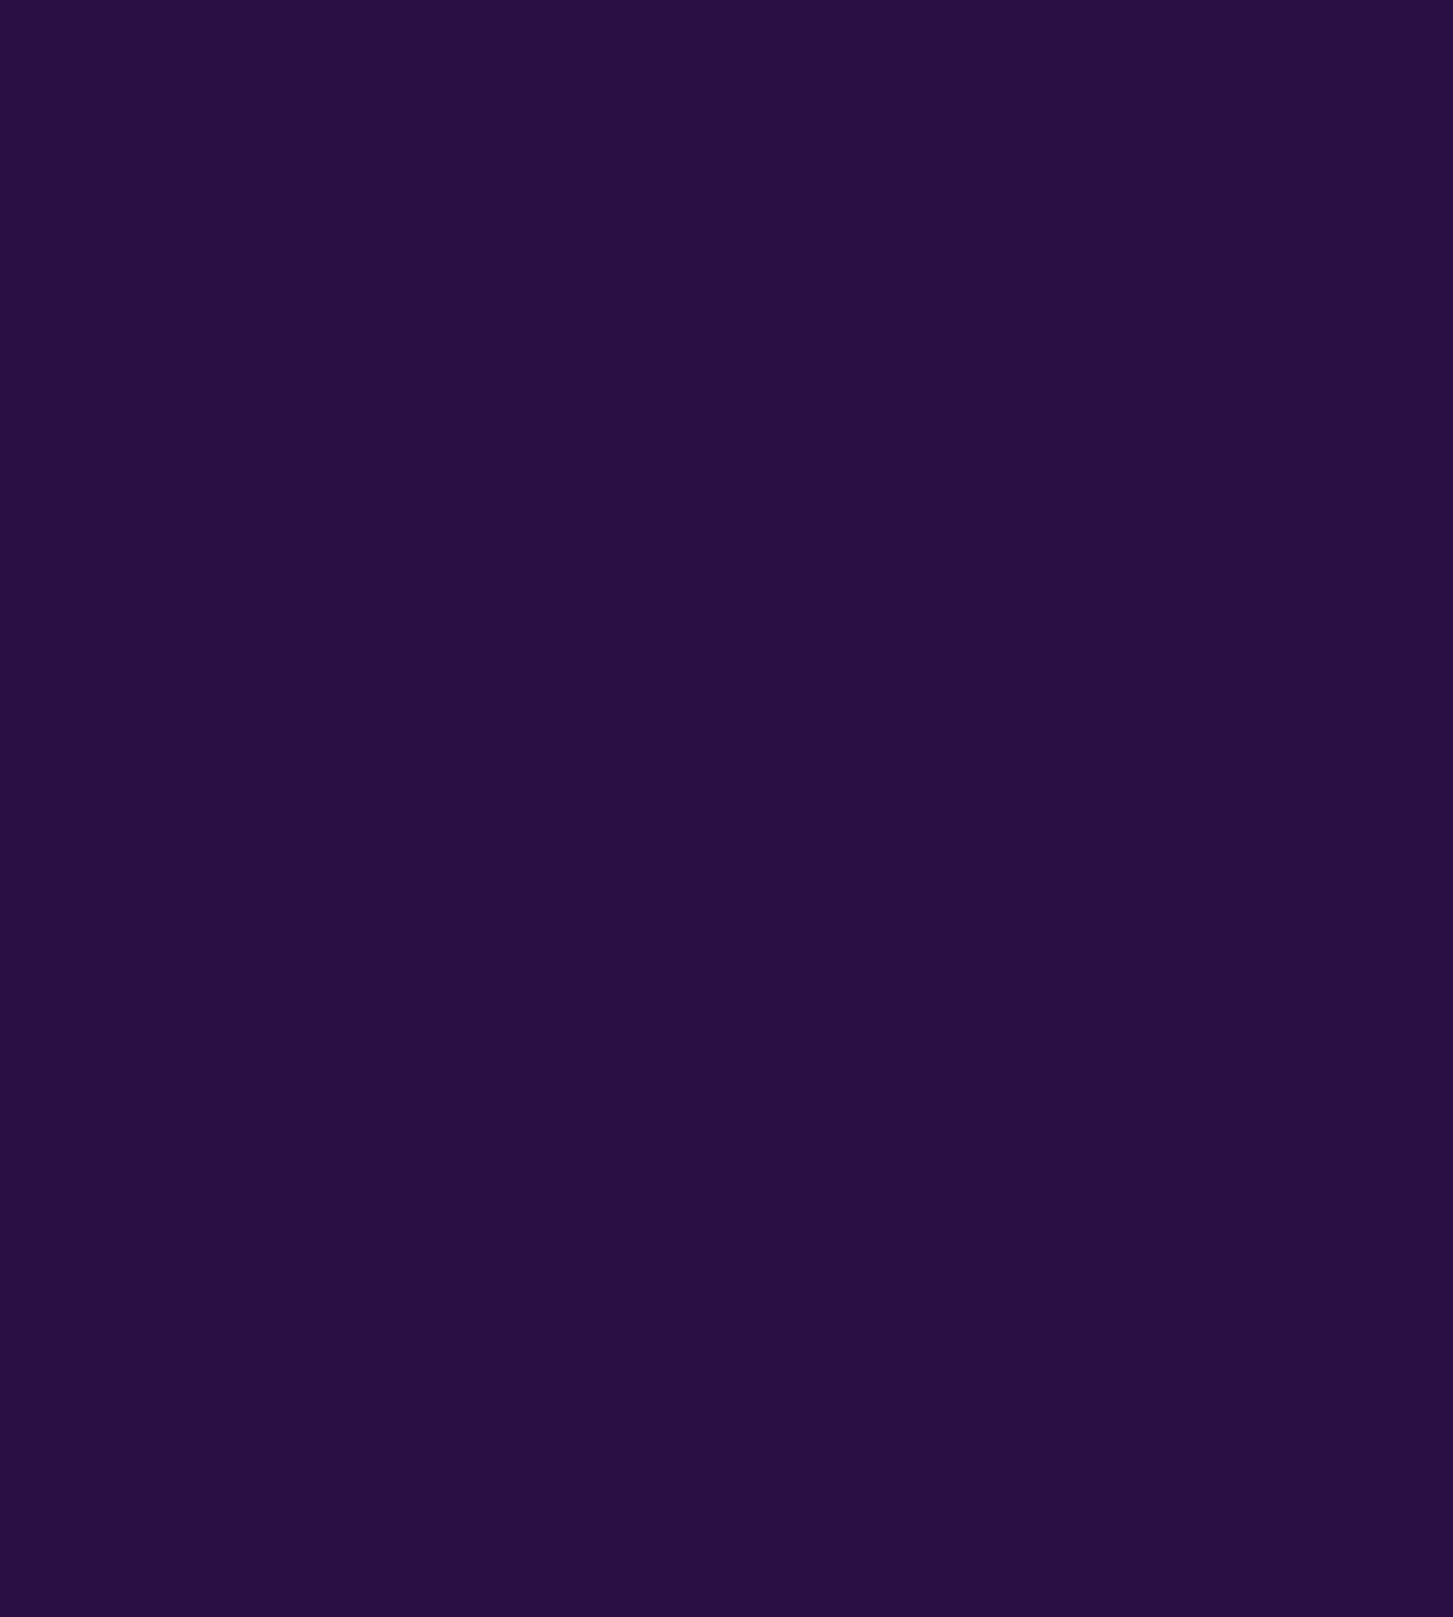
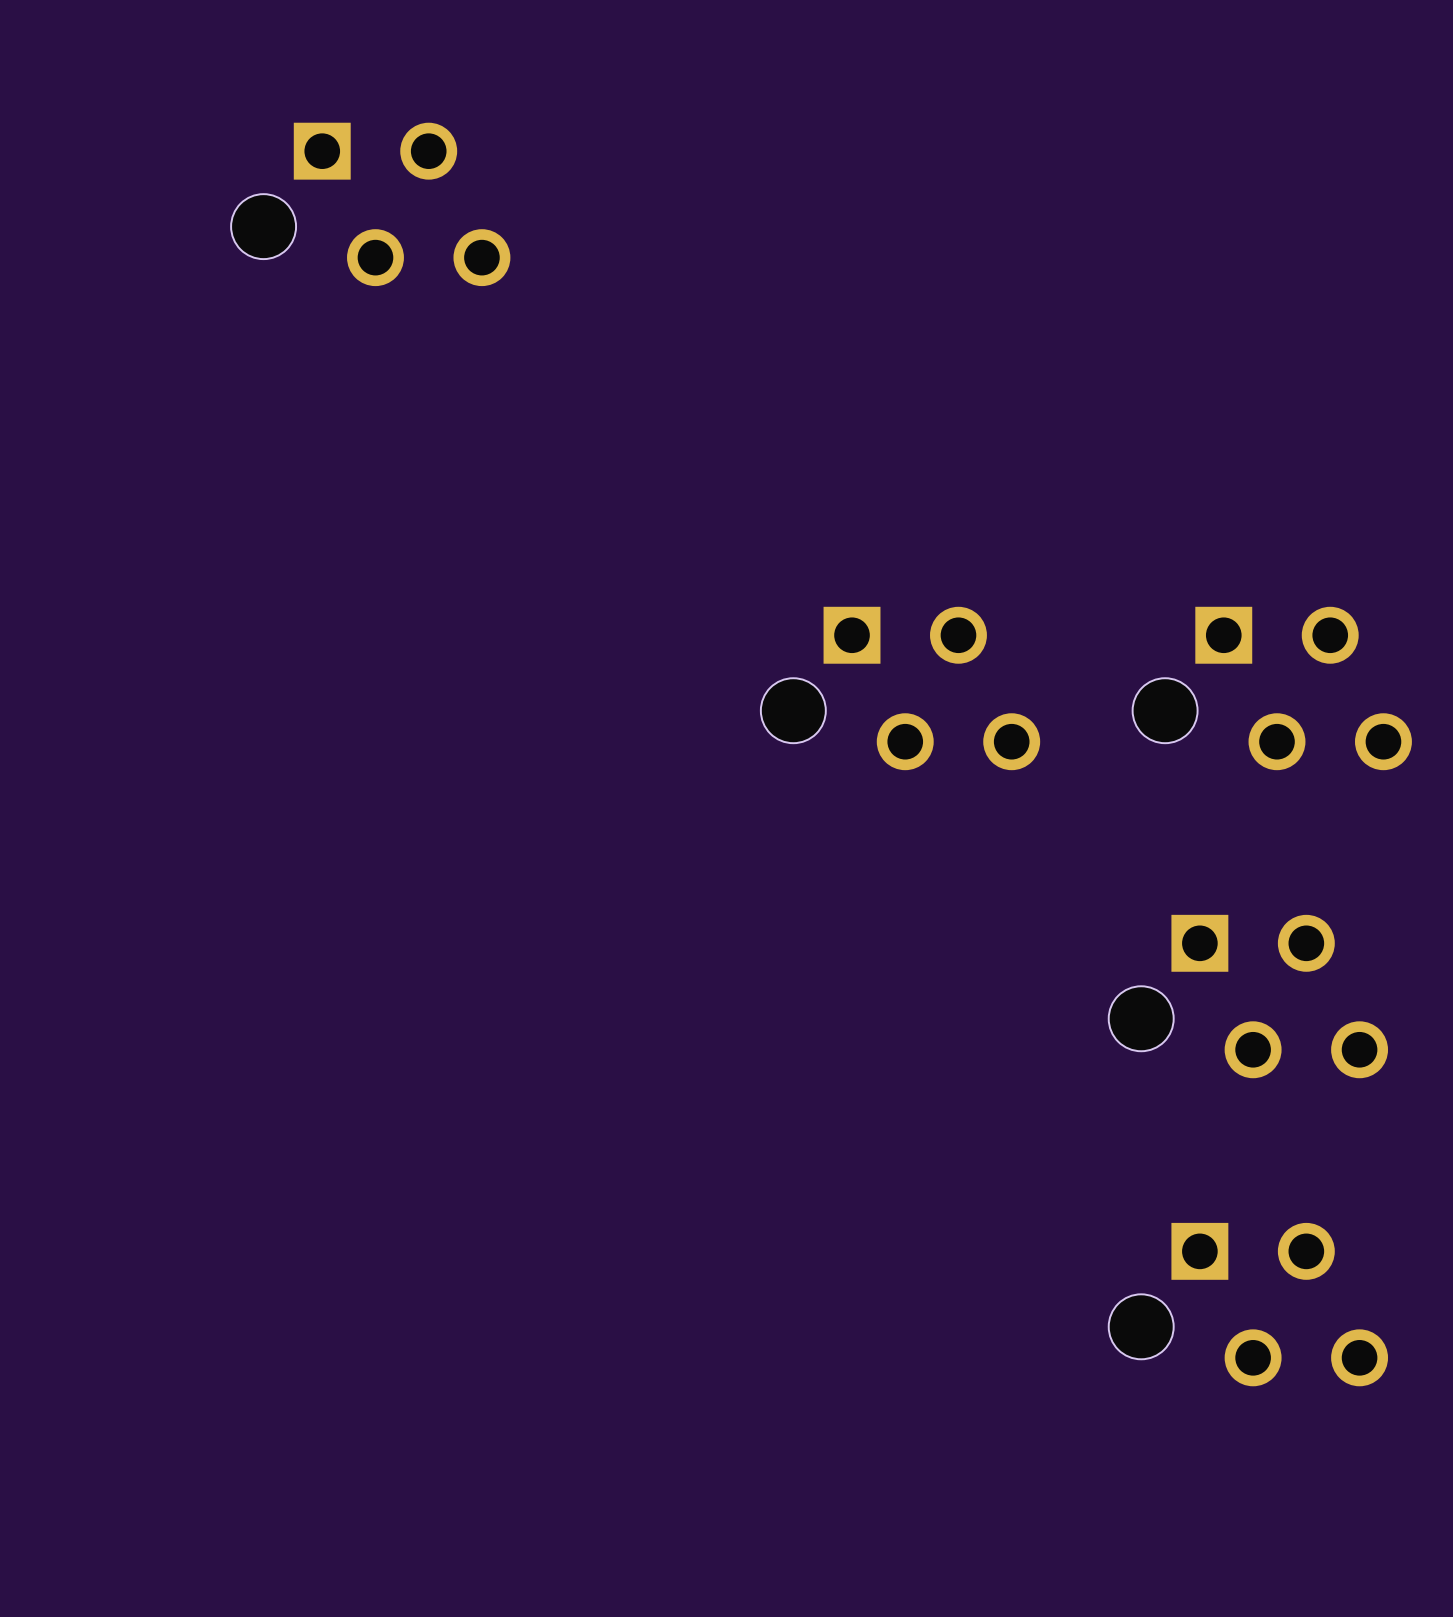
part: none -> (370, 204)
part: none -> (900, 688)
part: none -> (1272, 688)
part: none -> (1248, 996)
part: none -> (1248, 1304)

